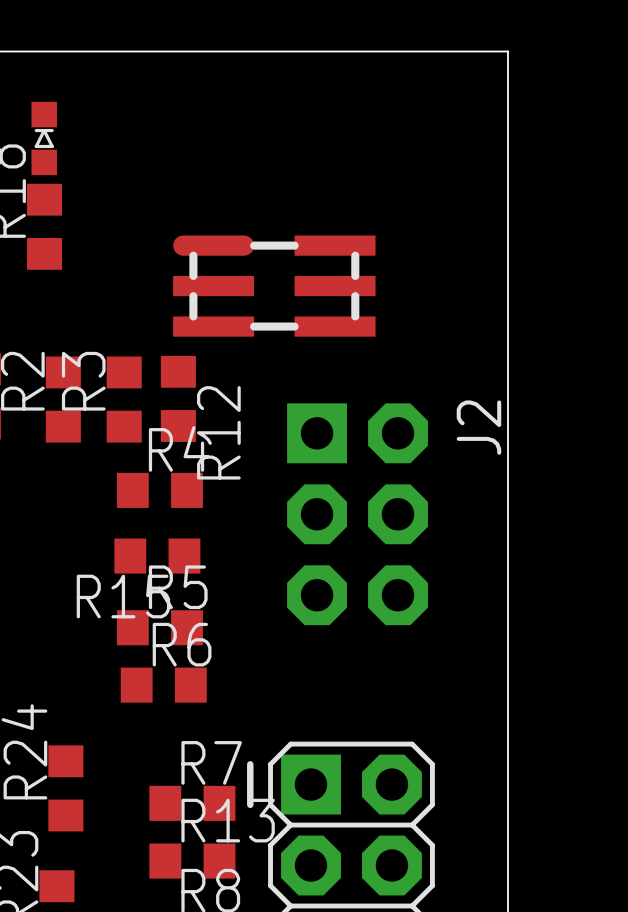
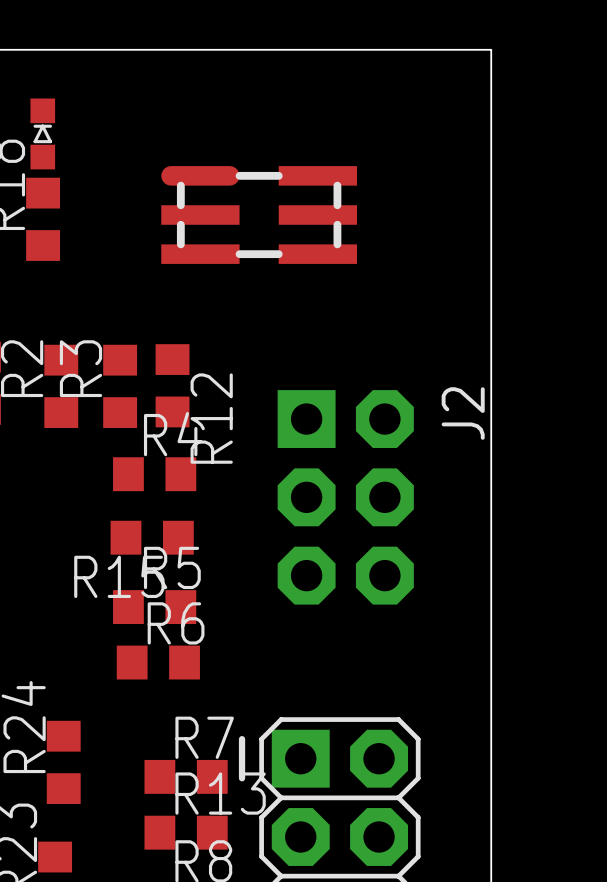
part position: (274, 286) -> (259, 215)

